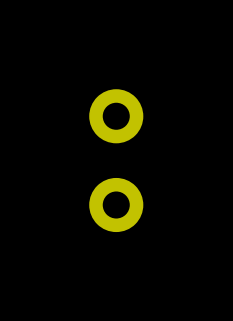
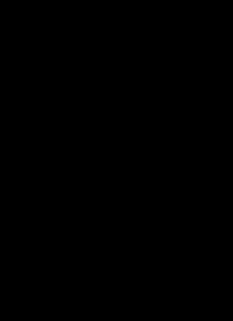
part: (116, 160) -> none

